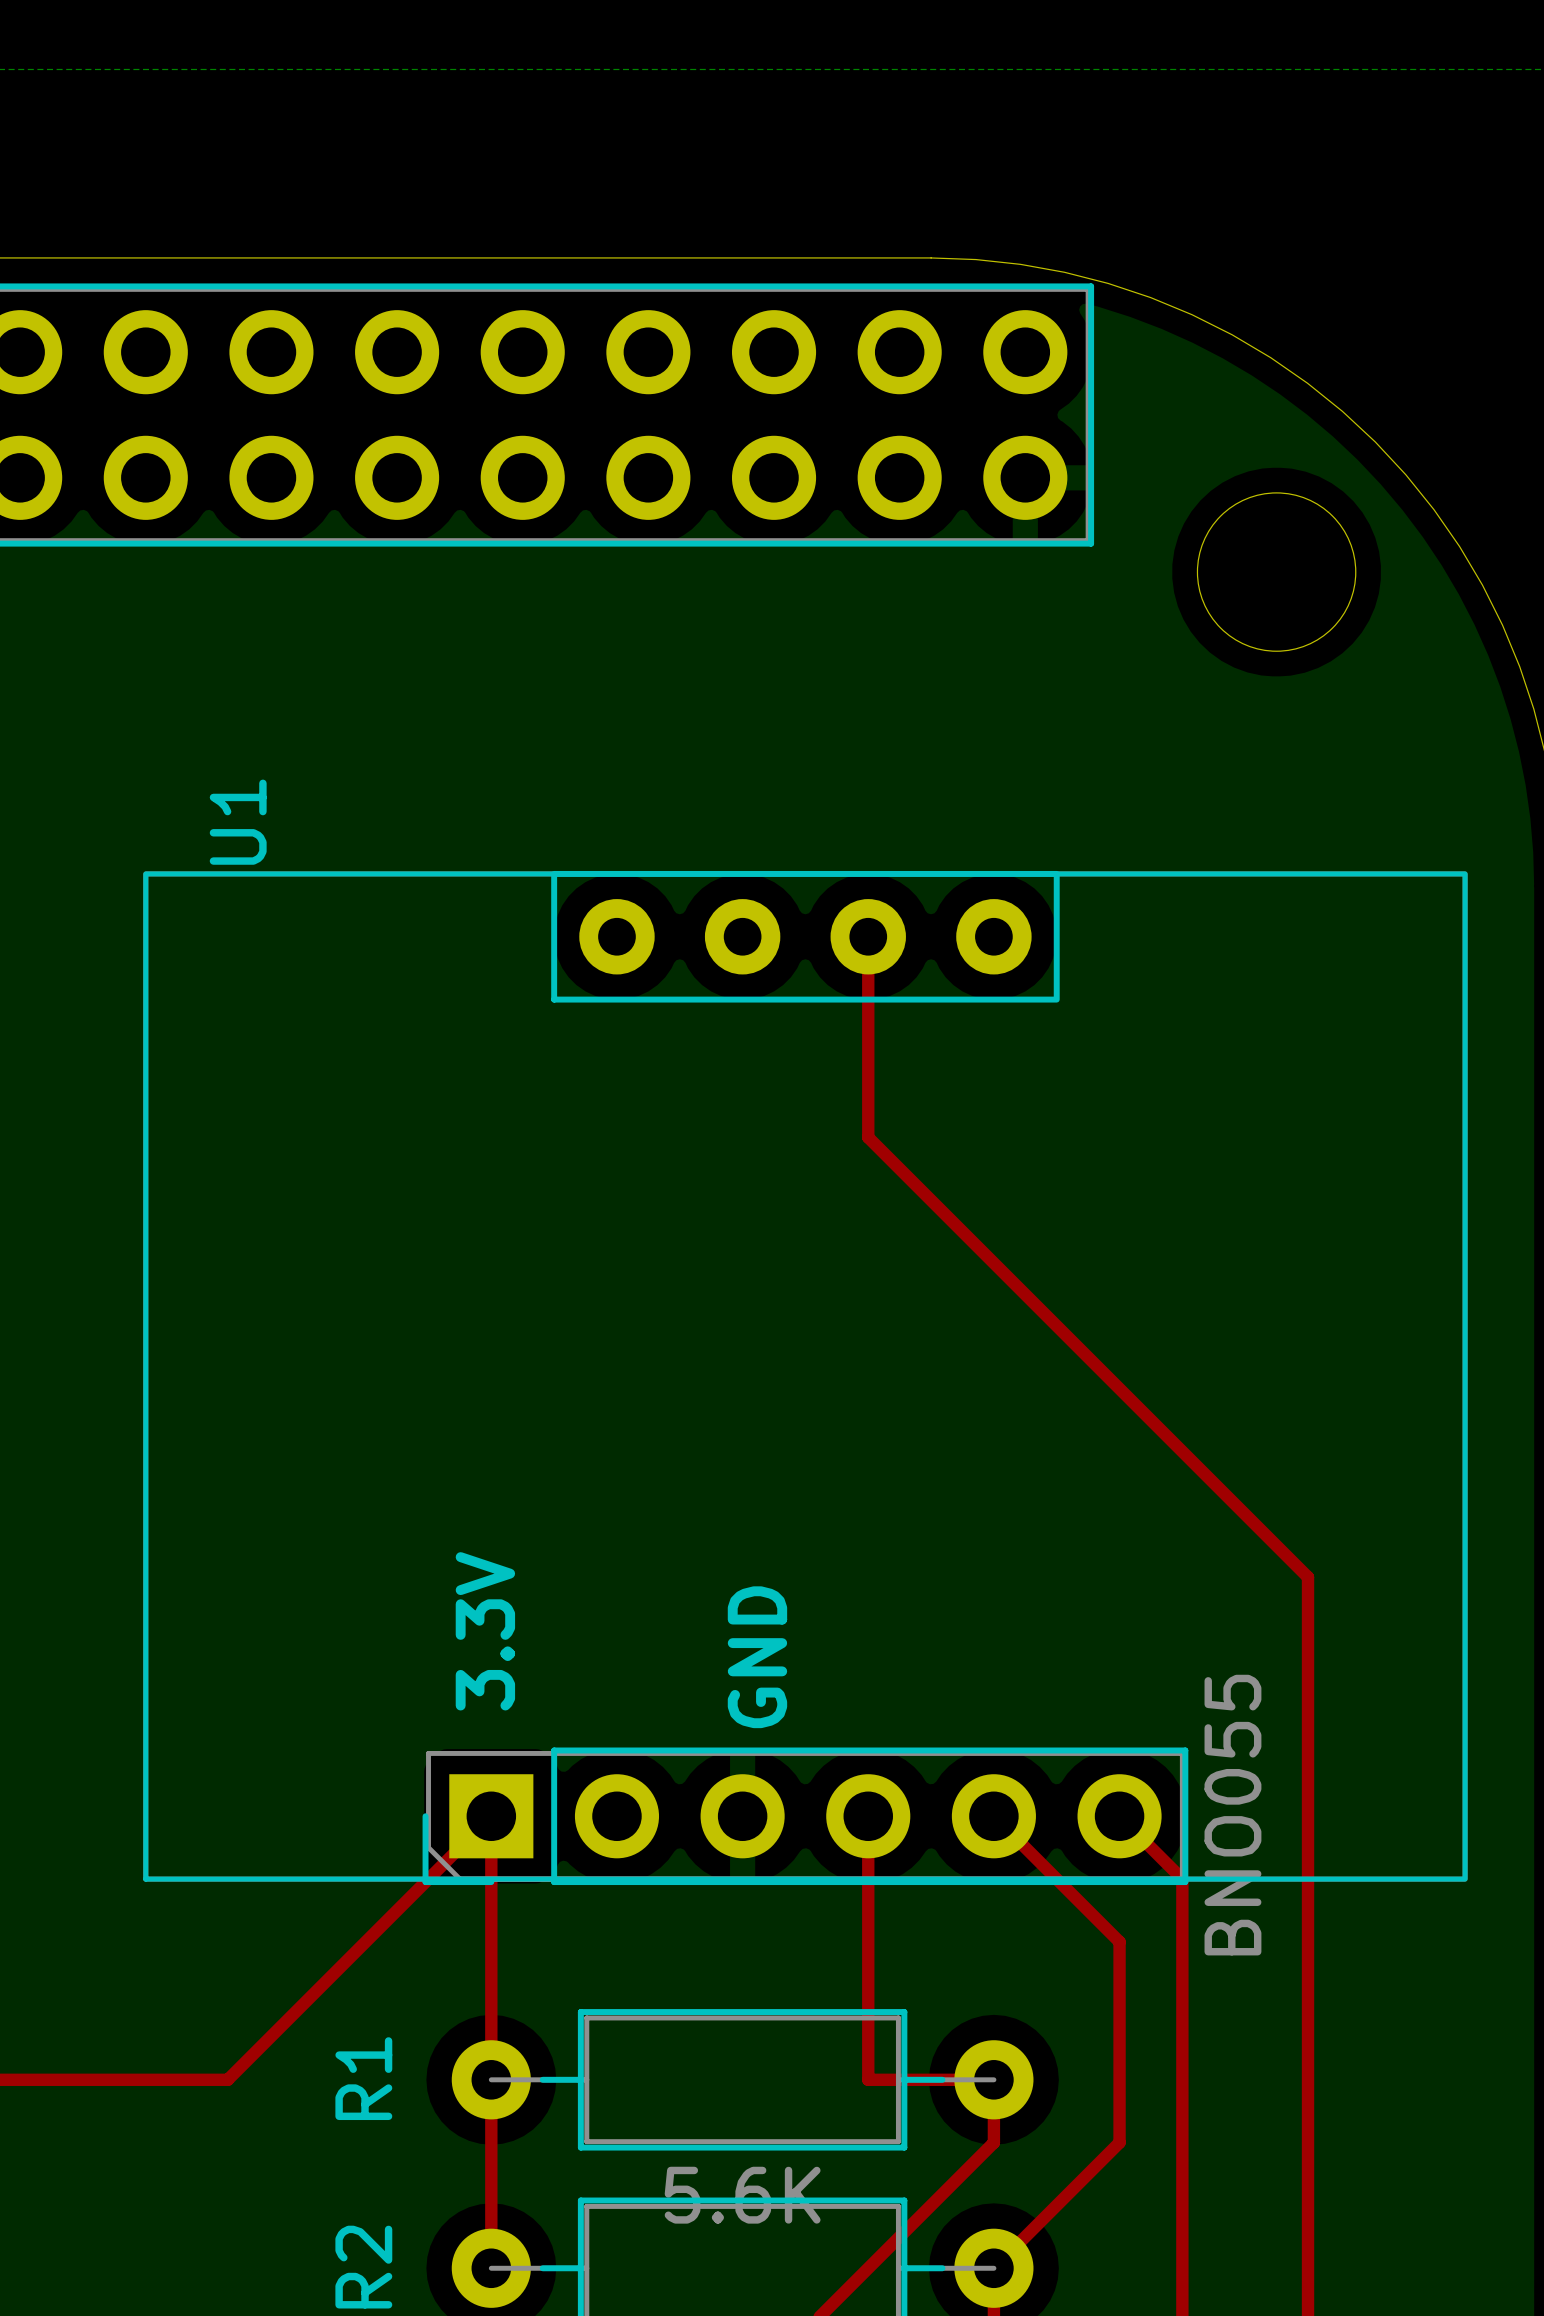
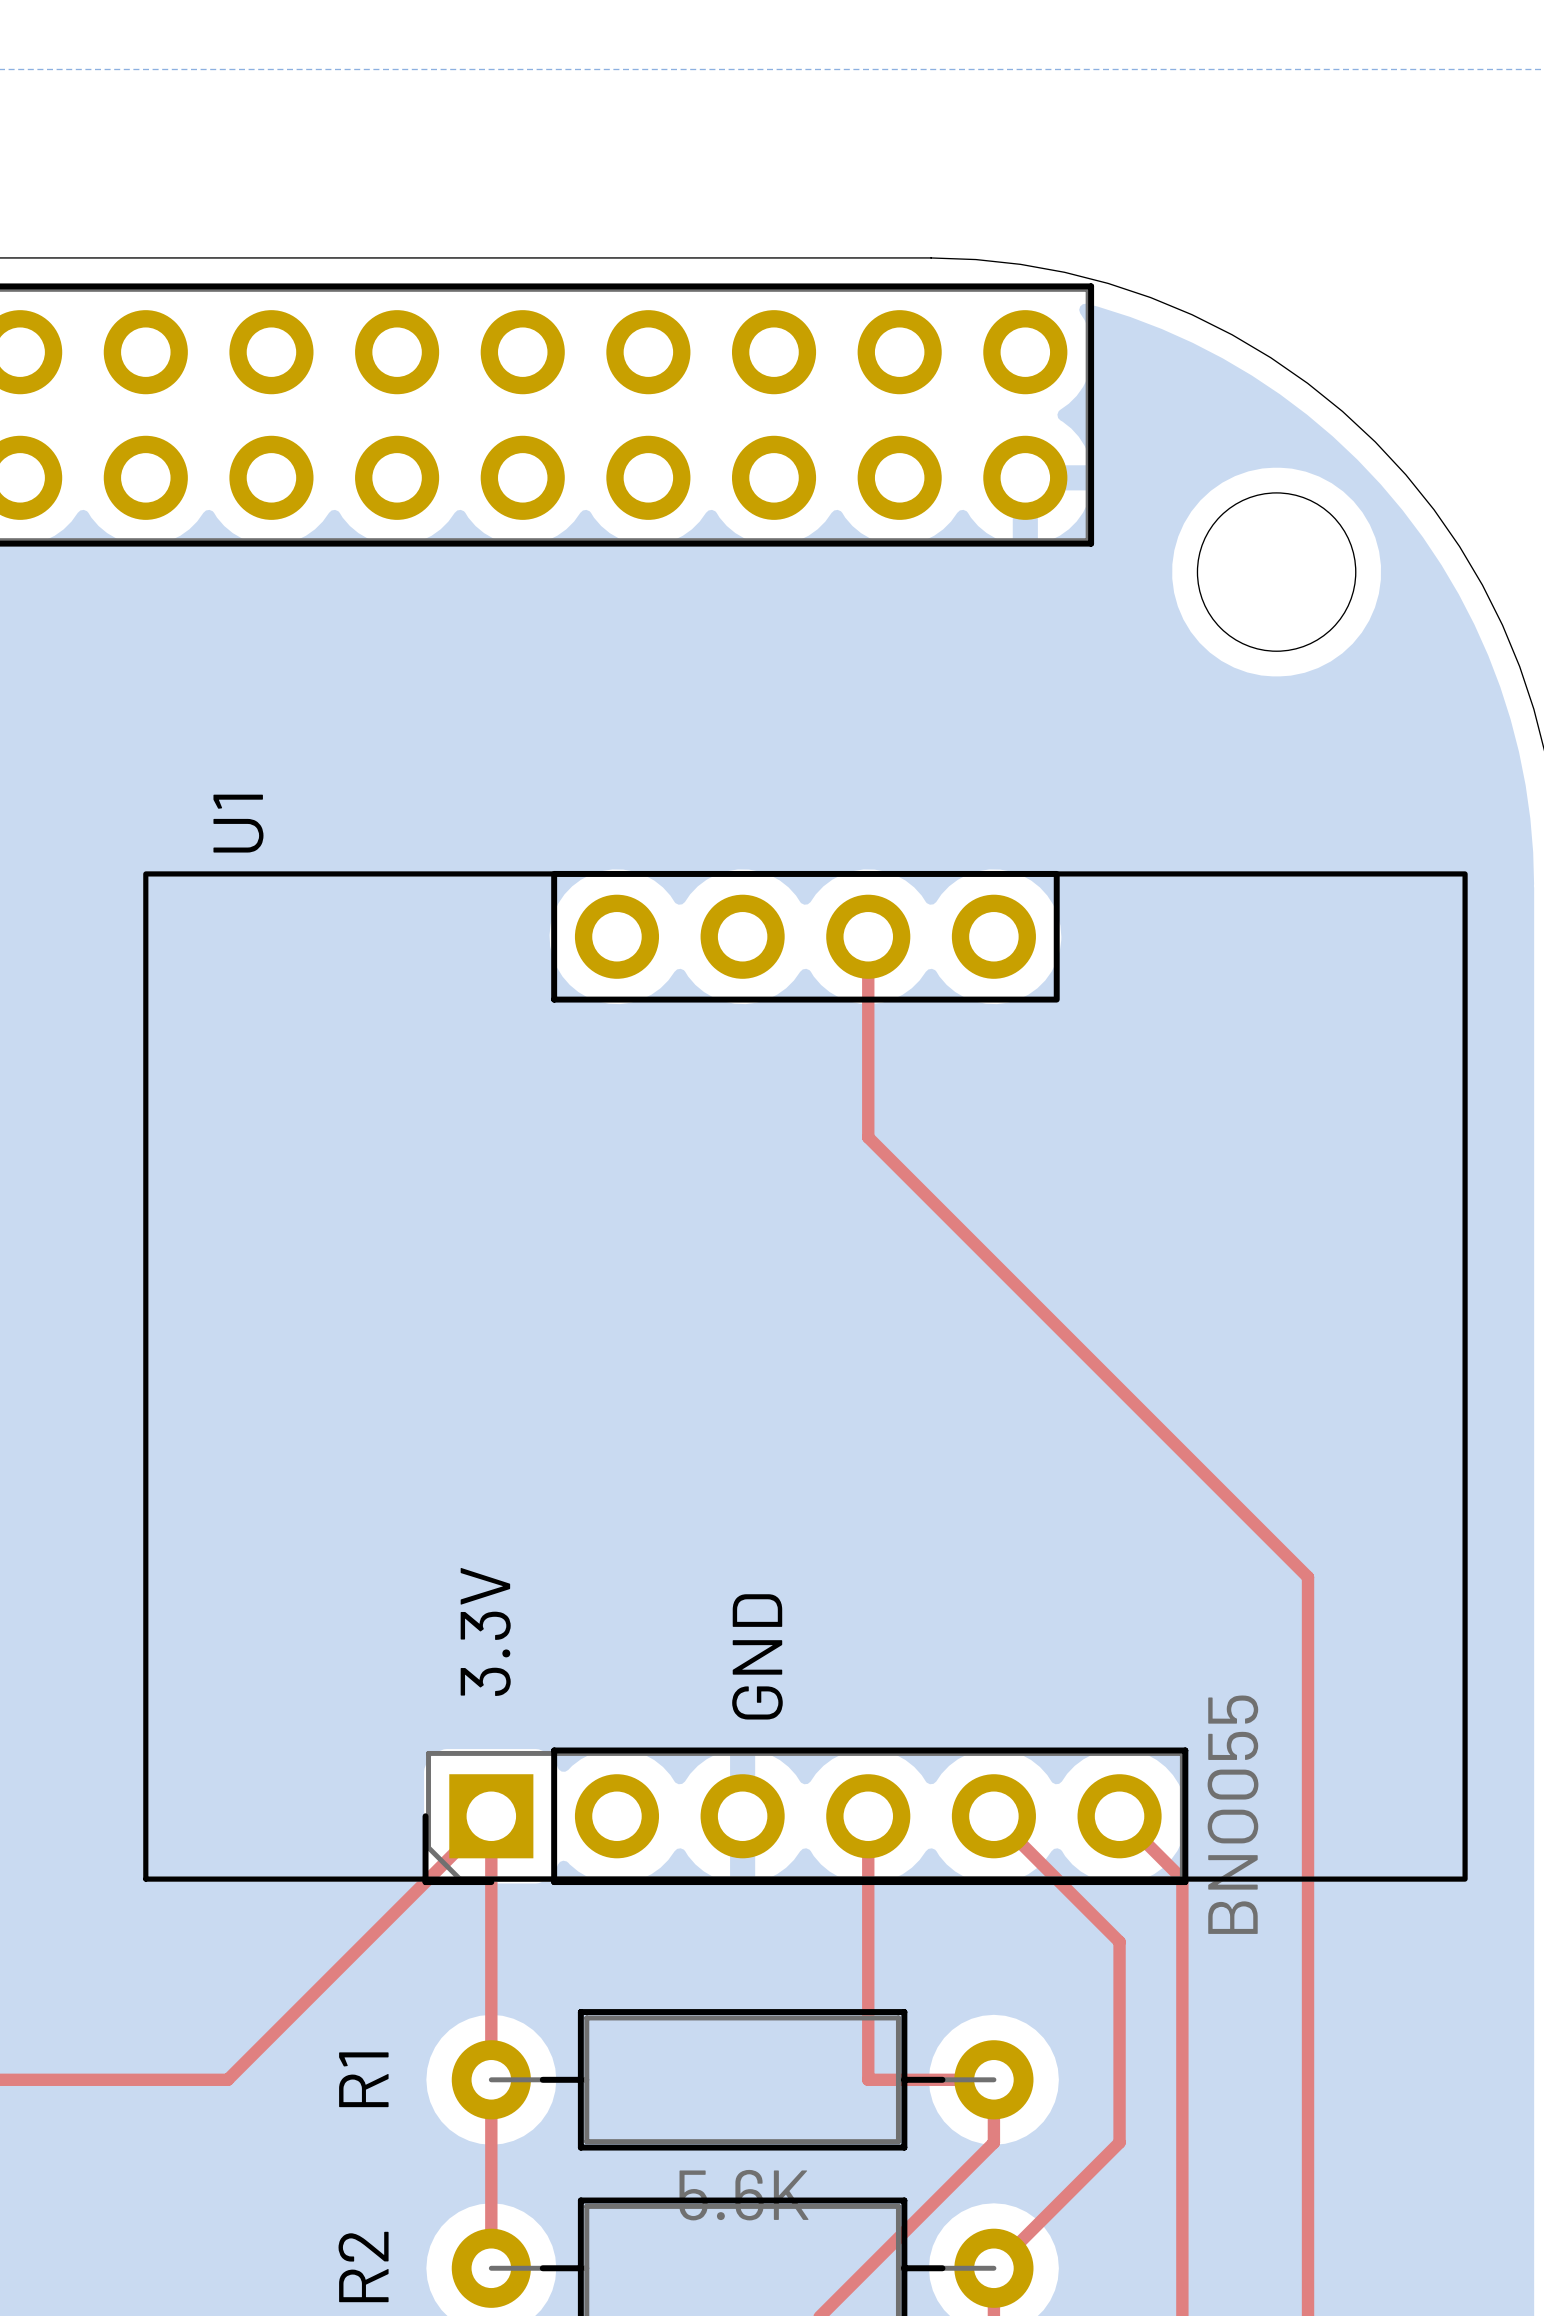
U1 footprint: [143, 870, 1468, 1886] -> [143, 870, 1468, 1886]

